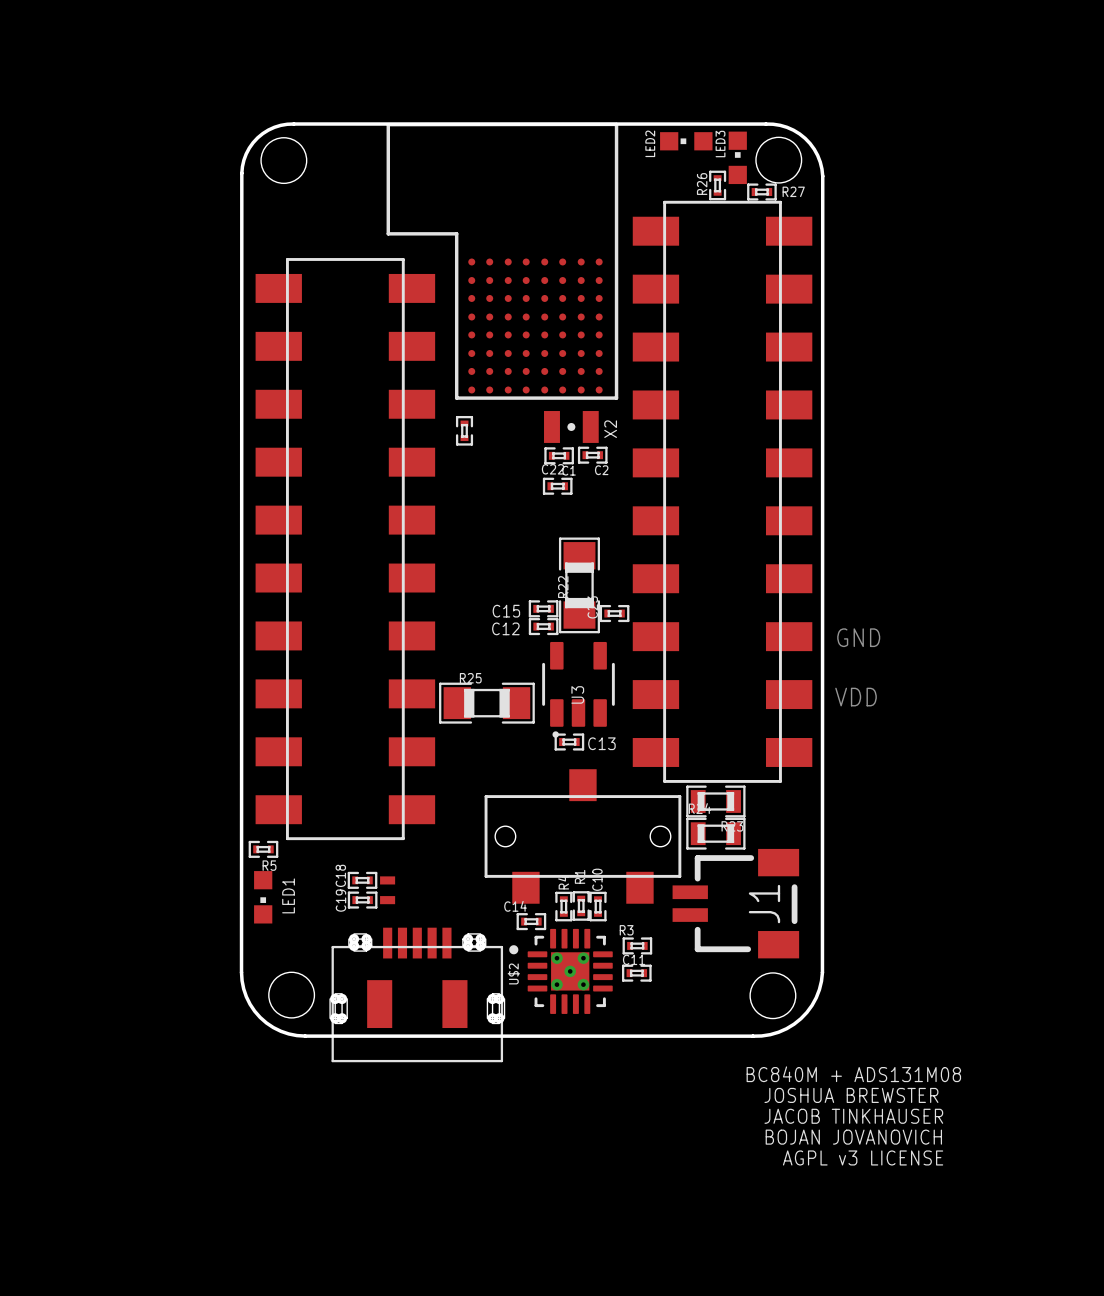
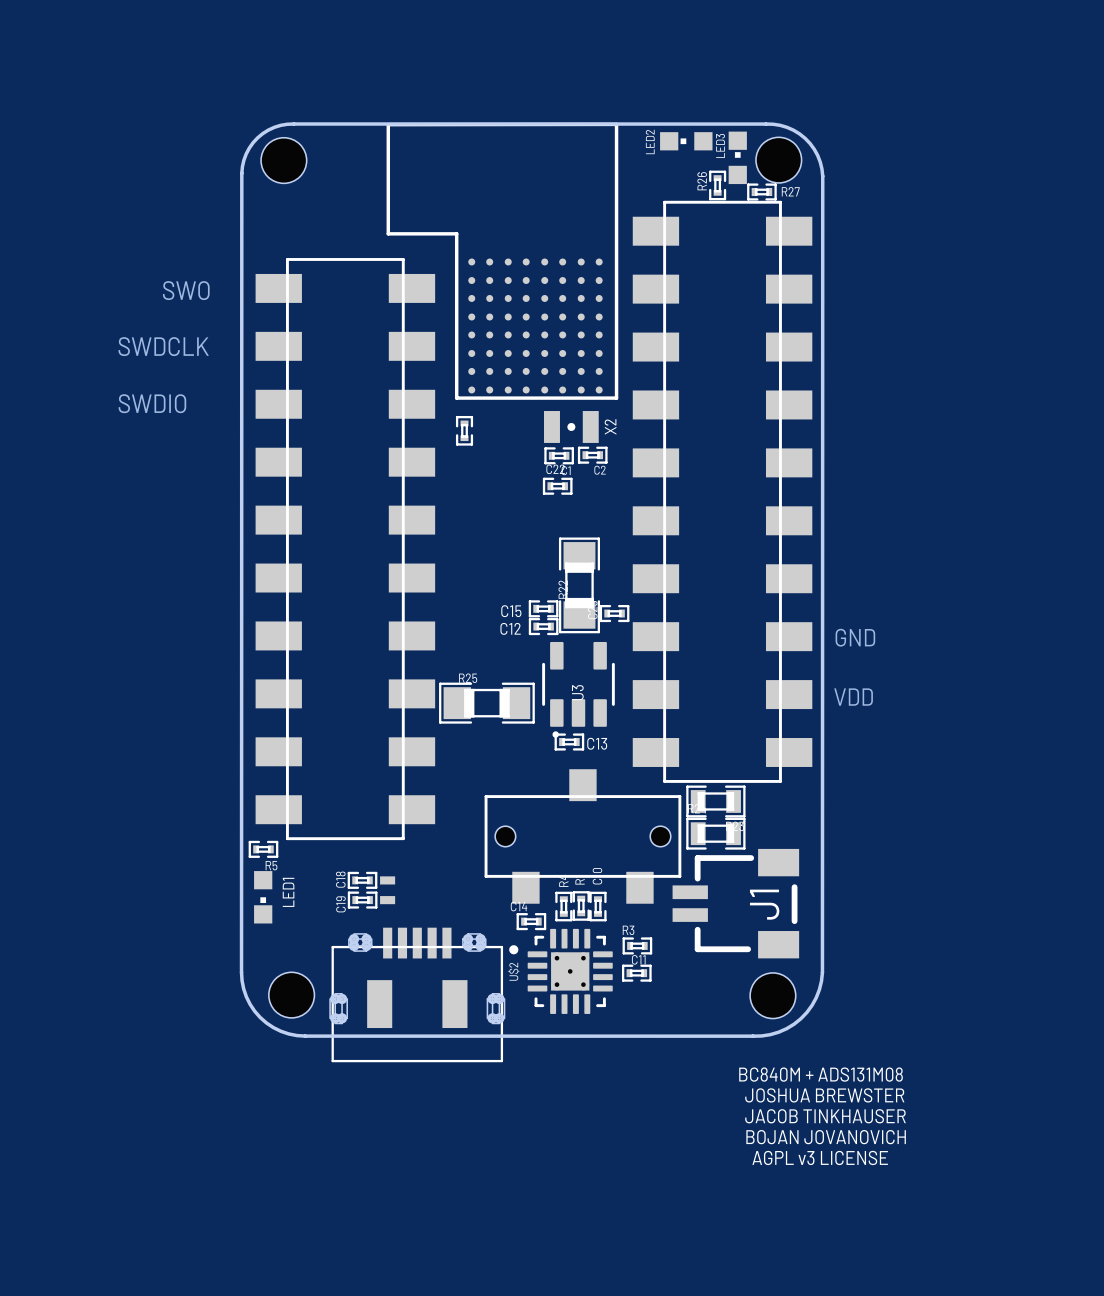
text: none -> SWO (186, 290)
text: none -> SWDCLK (163, 346)
text: none -> SWDIO (152, 403)

